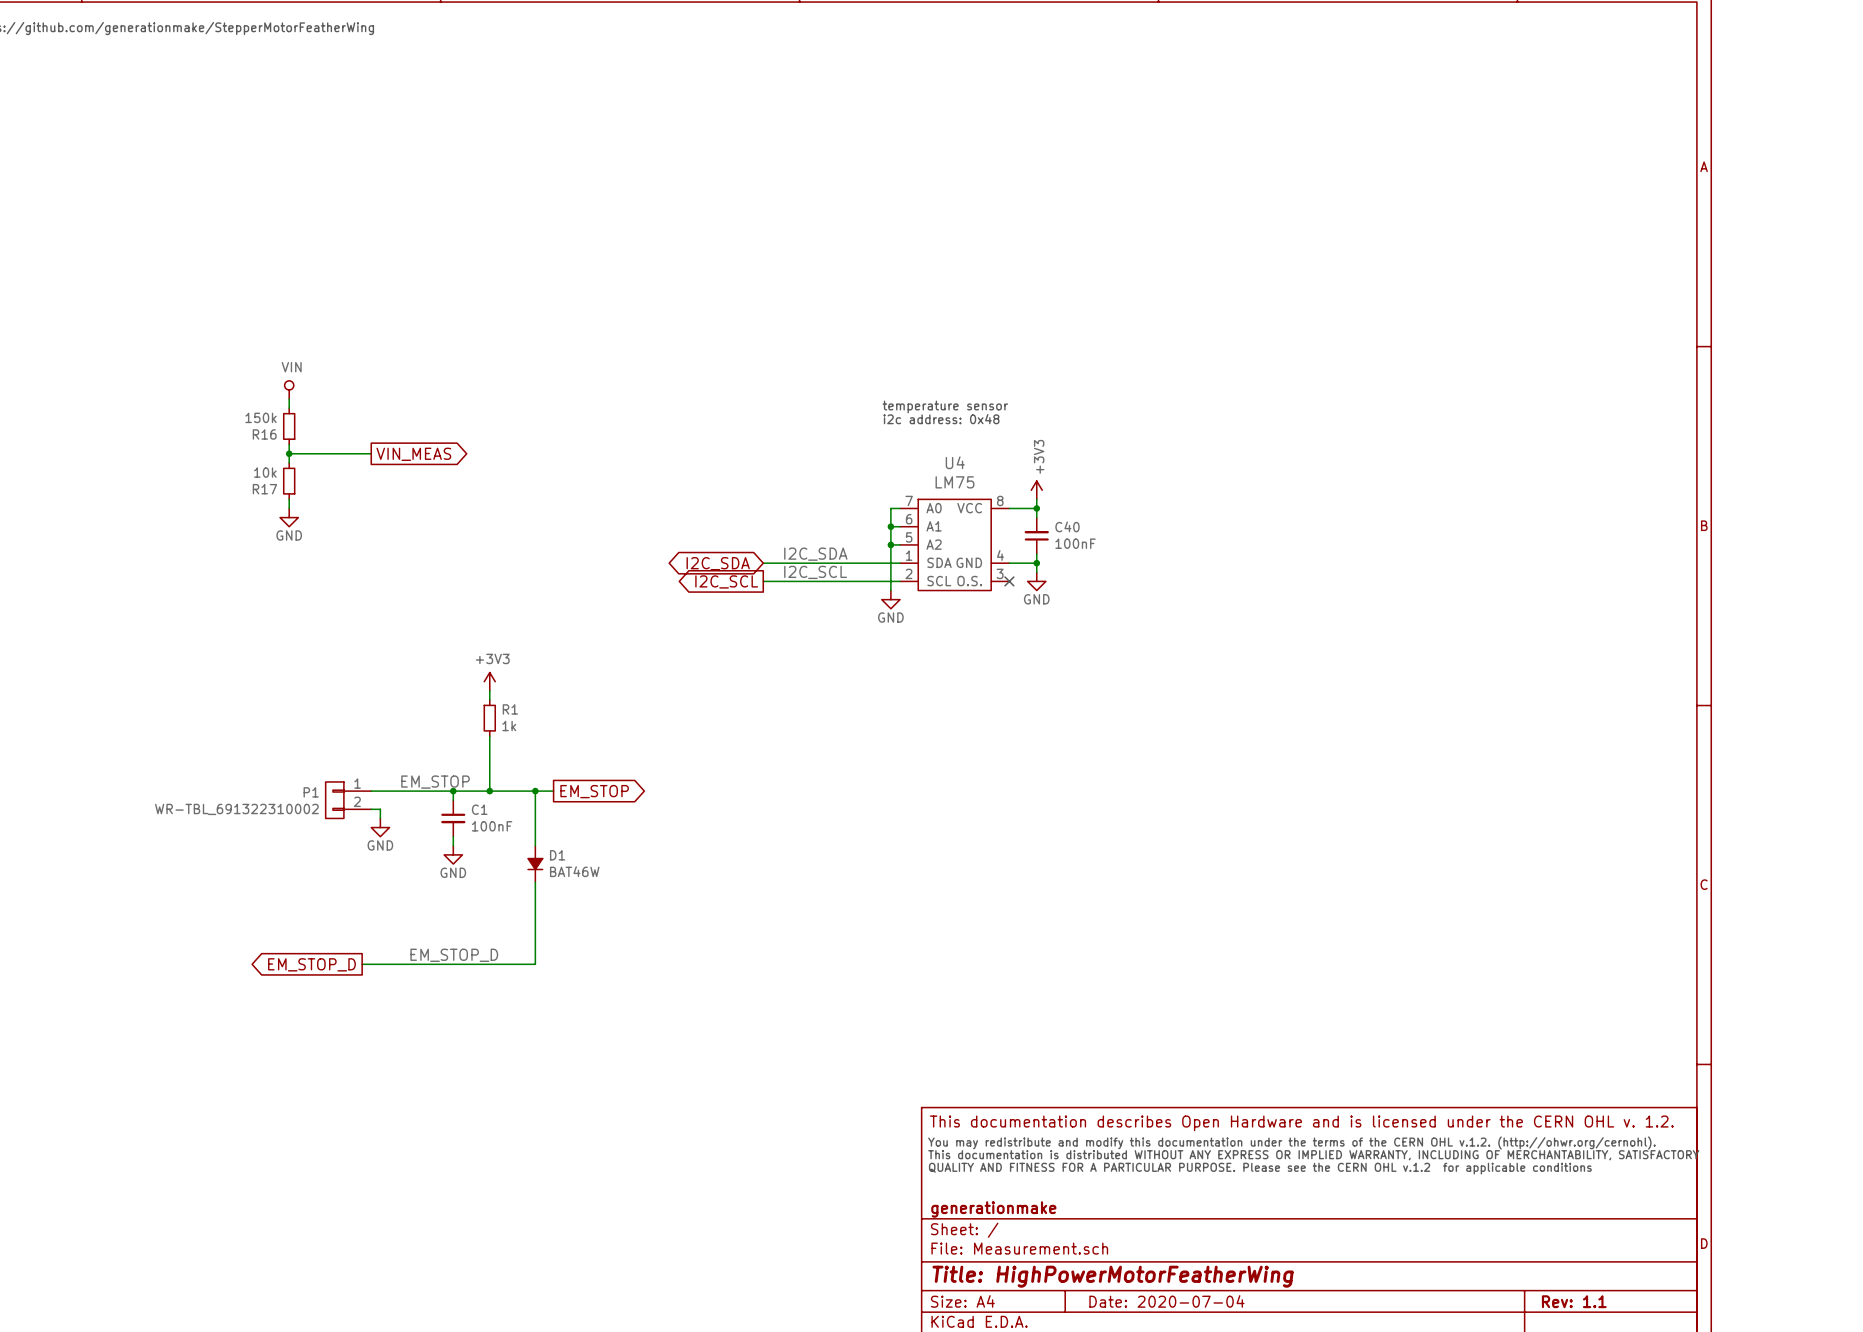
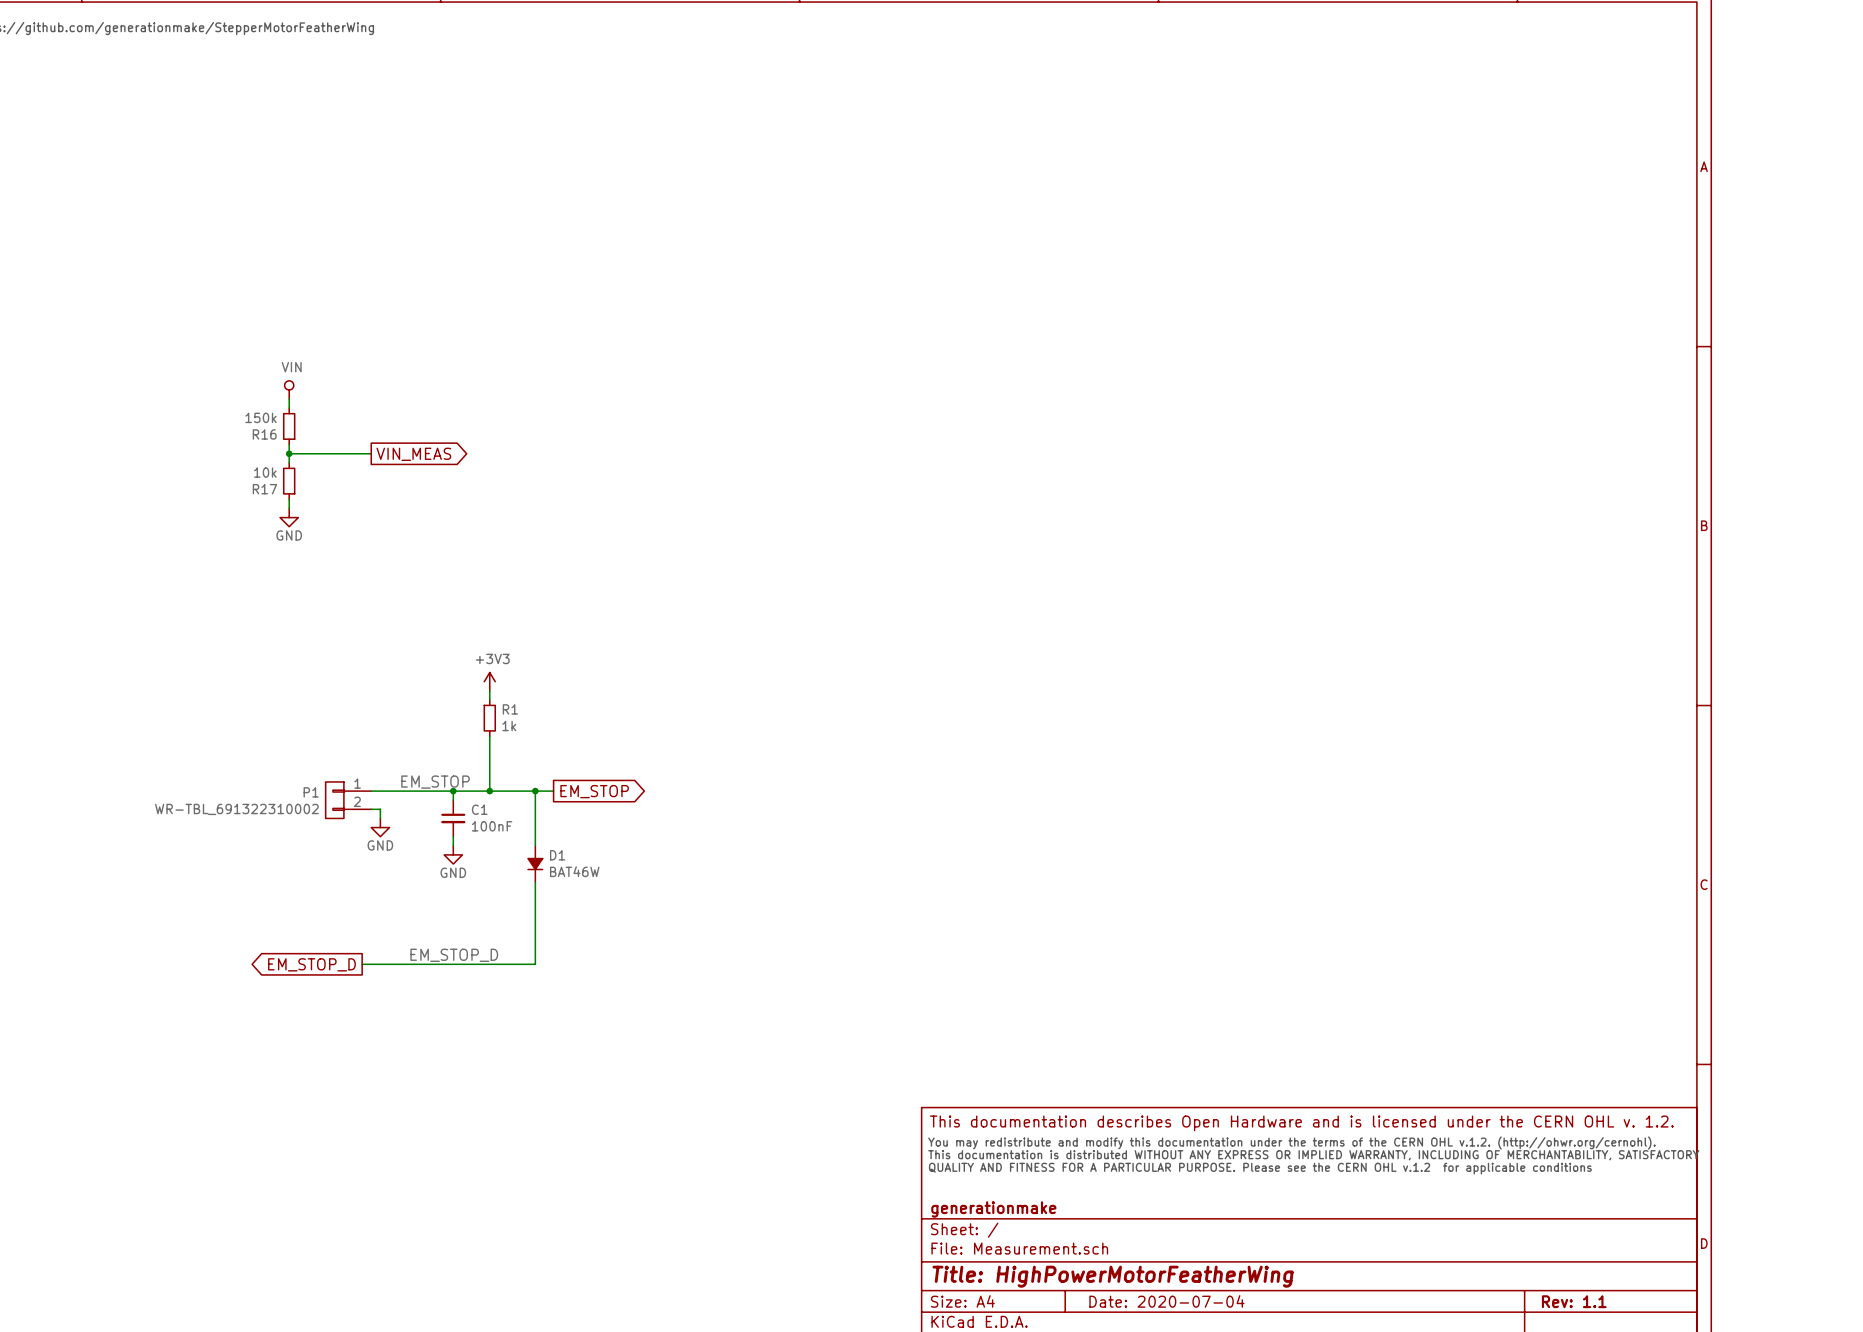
text: temperature sensor (945, 406) -> none
text: i2c address: 0x48 (941, 419) -> none
power symbol: +3V3 (1036, 490) -> none
wire: (1036, 499) (1036, 517) -> none
wire: (900, 508) (890, 508) (890, 590) -> none
wire: (1009, 508) (1036, 508) -> none
junction: (1036, 508) -> none
wire: (890, 526) (900, 526) -> none
junction: (890, 526) -> none
C40: 100nF (1036, 535) -> none
wire: (890, 544) (900, 544) -> none
junction: (890, 544) -> none
U4: LM75 (954, 544) -> none
label: I2C_SDA (815, 554) -> none
wire: (1036, 554) (1036, 572) -> none
global label: I2C_SDA (718, 563) -> none
wire: (763, 563) (900, 563) -> none
wire: (1009, 563) (1036, 563) -> none
junction: (1036, 563) -> none
label: I2C_SCL (815, 572) -> none
global label: I2C_SCL (726, 581) -> none
wire: (763, 581) (900, 581) -> none
no-connect mark: (1009, 581) -> none
power symbol: GND (1036, 581) -> none
power symbol: GND (890, 599) -> none

